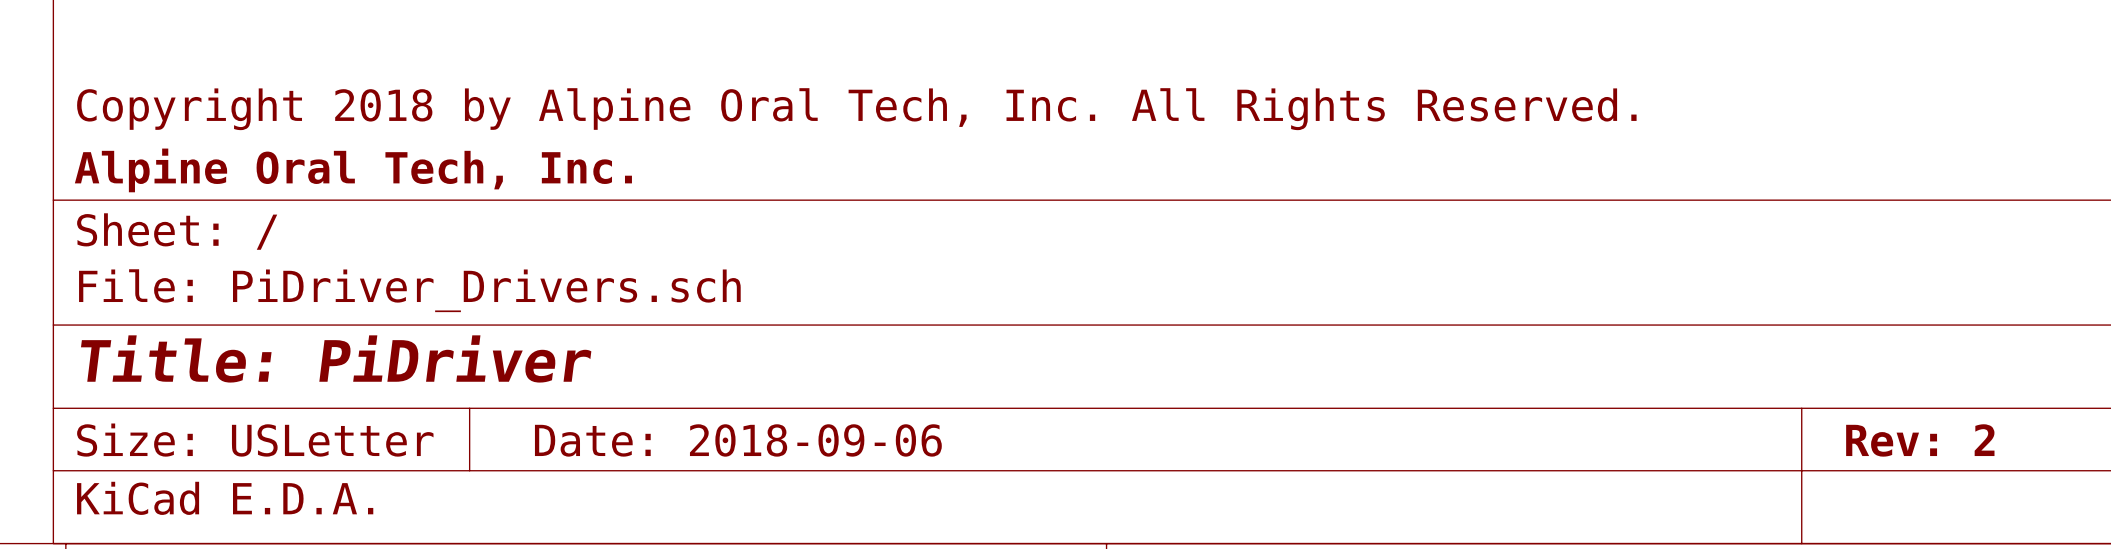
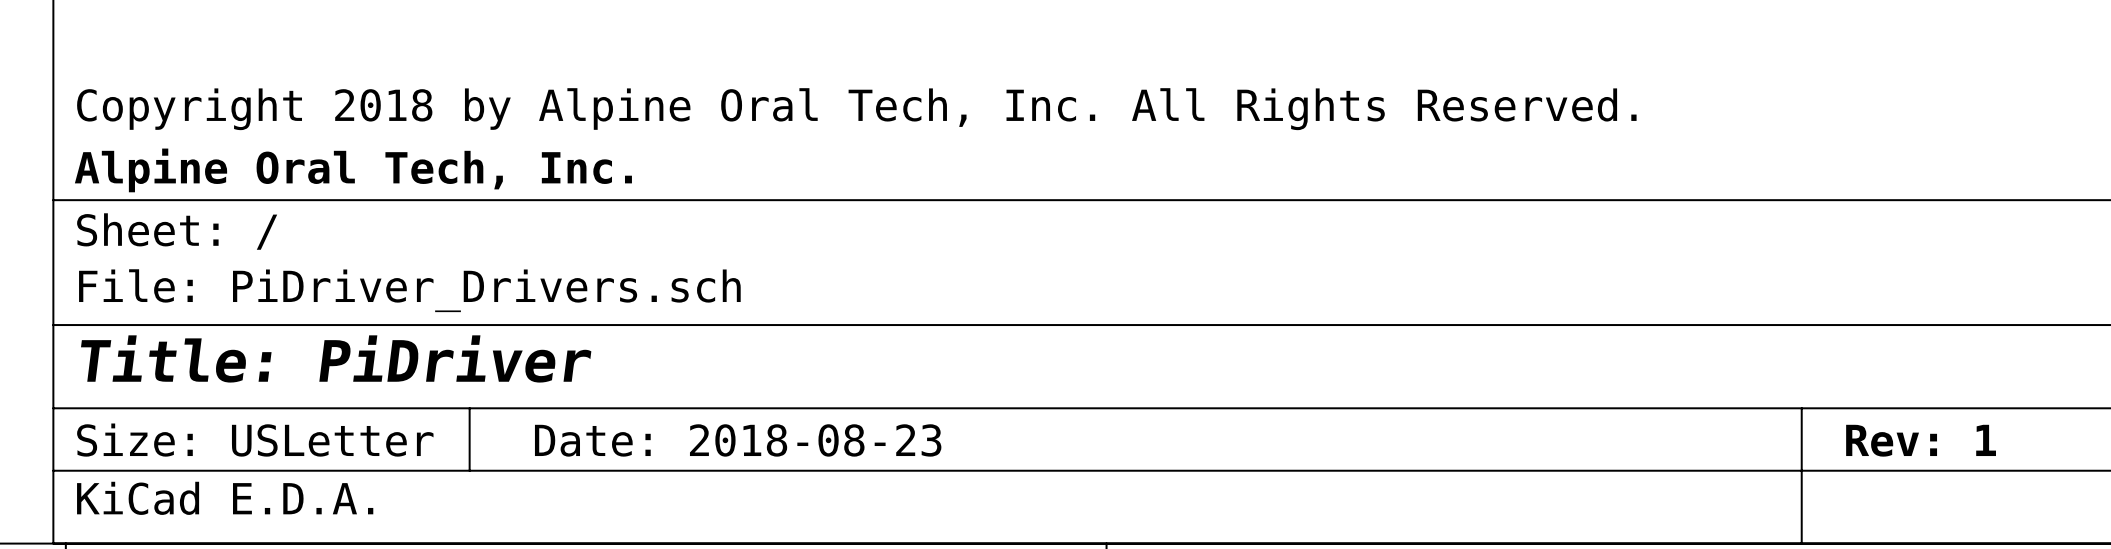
title block: Date: 2018-09-06 (738, 440) -> Date: 2018-08-23 (738, 440)
title block: Rev: 2 (1920, 440) -> Rev: 1 (1921, 440)

